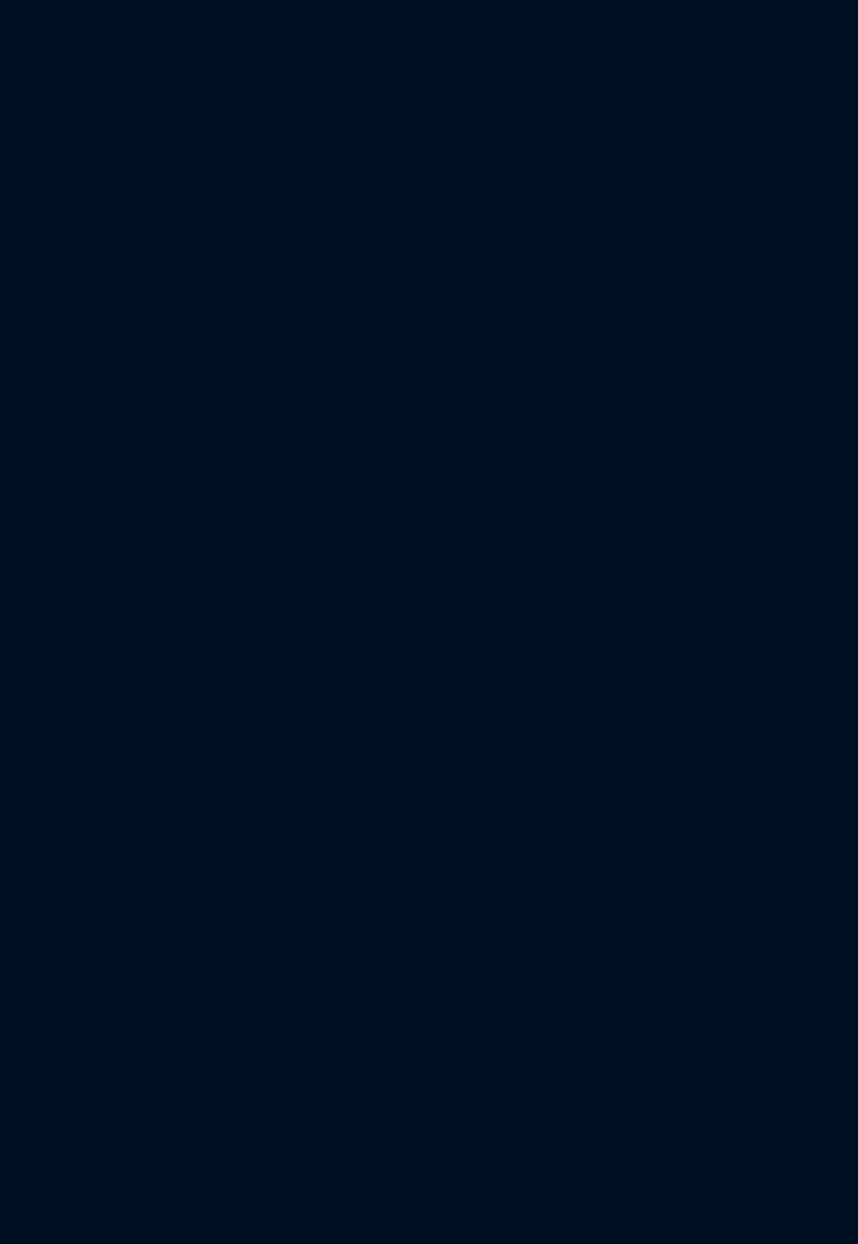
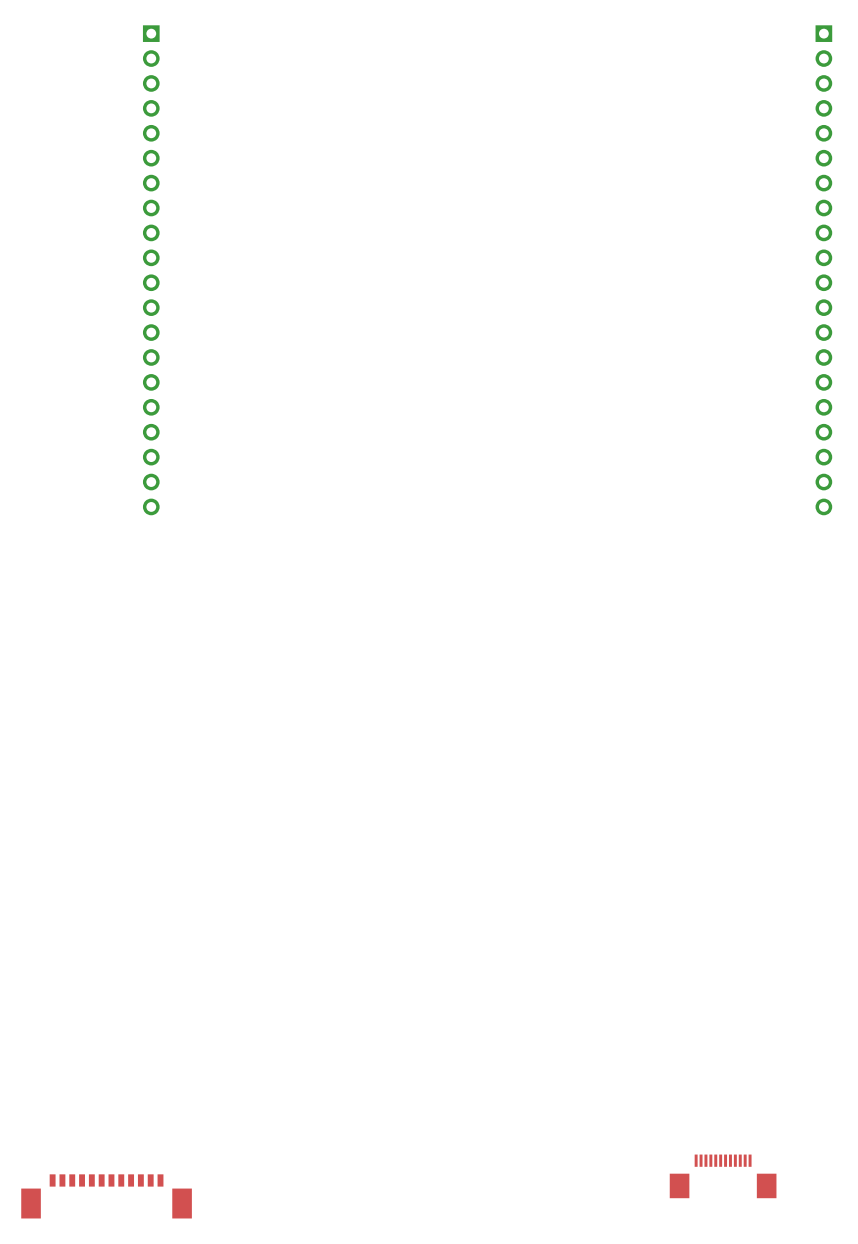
part: none -> (151, 270)
part: none -> (823, 270)
part: none -> (723, 1176)
part: none -> (106, 1196)

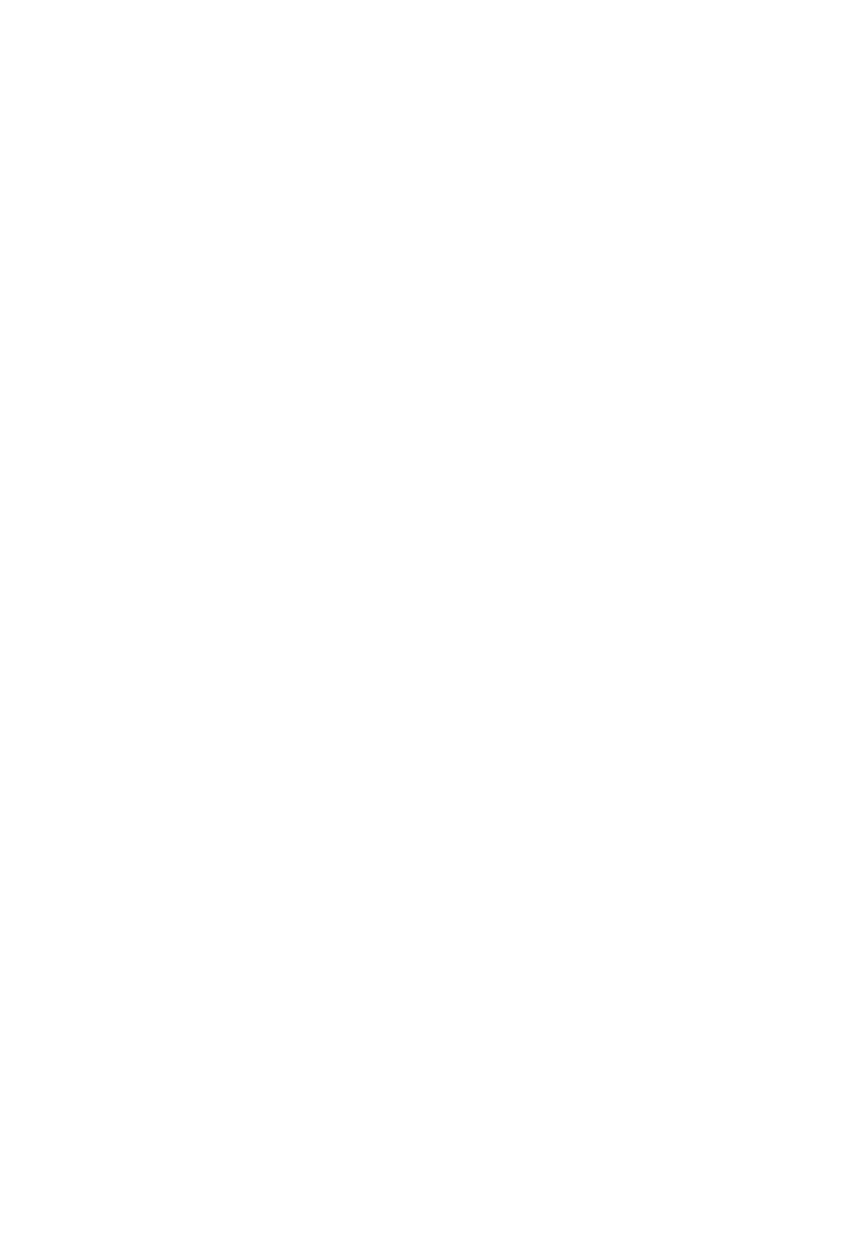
part: (151, 270) -> none
part: (823, 270) -> none
part: (723, 1176) -> none
part: (106, 1196) -> none

